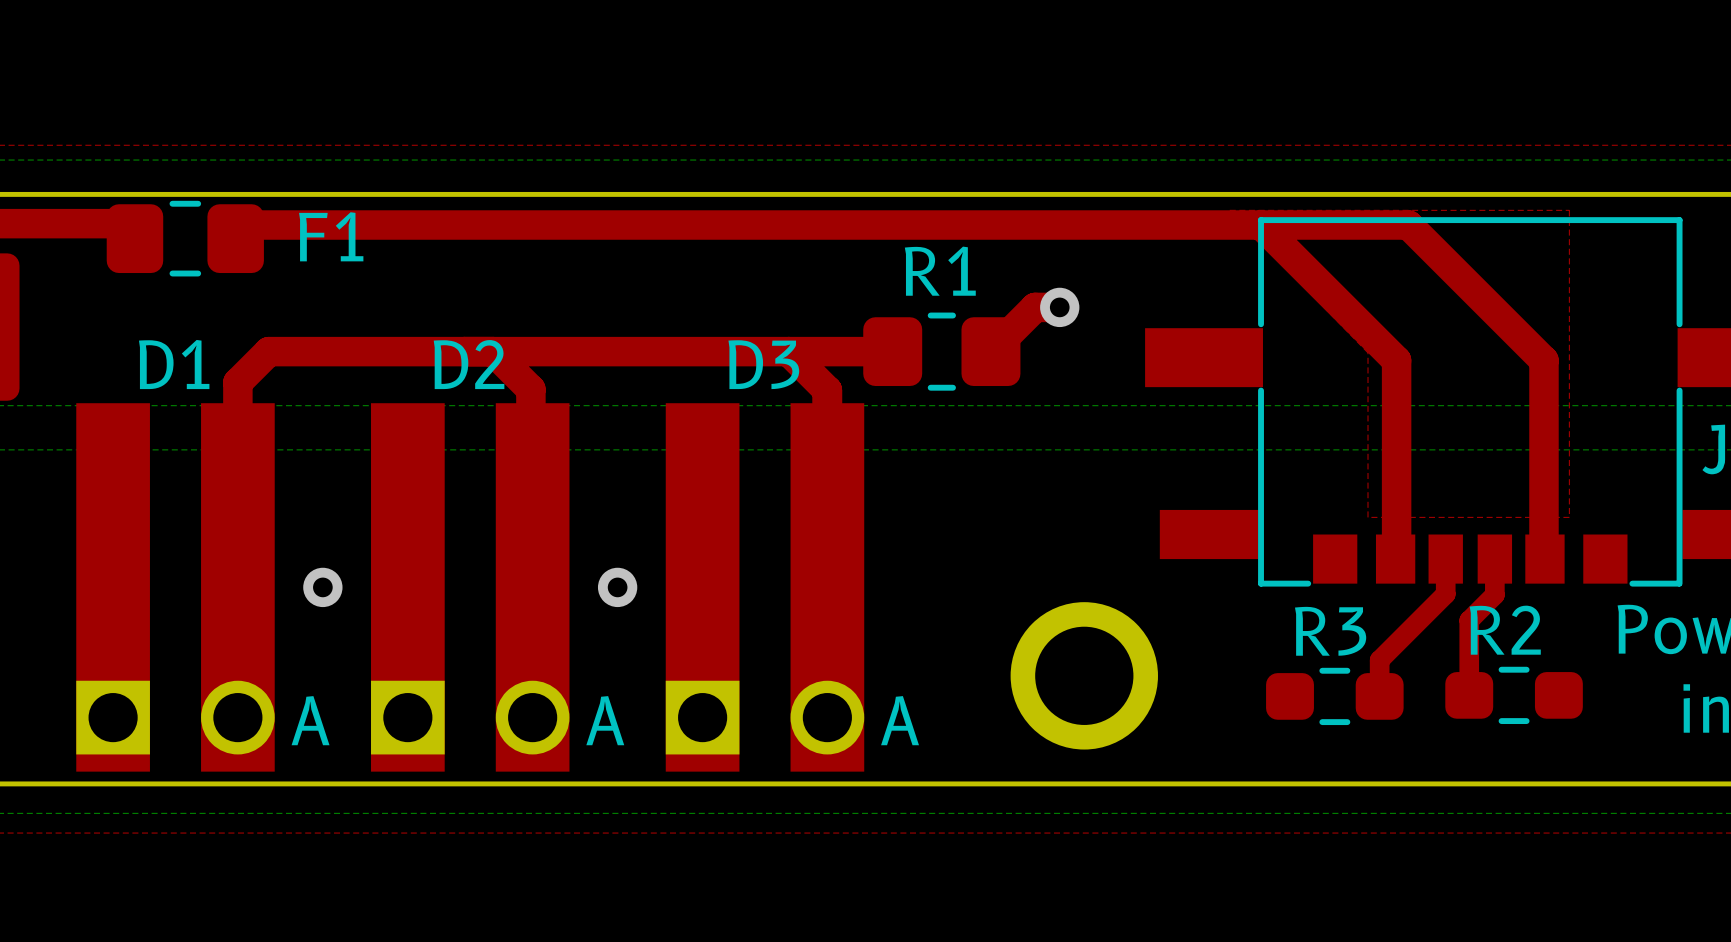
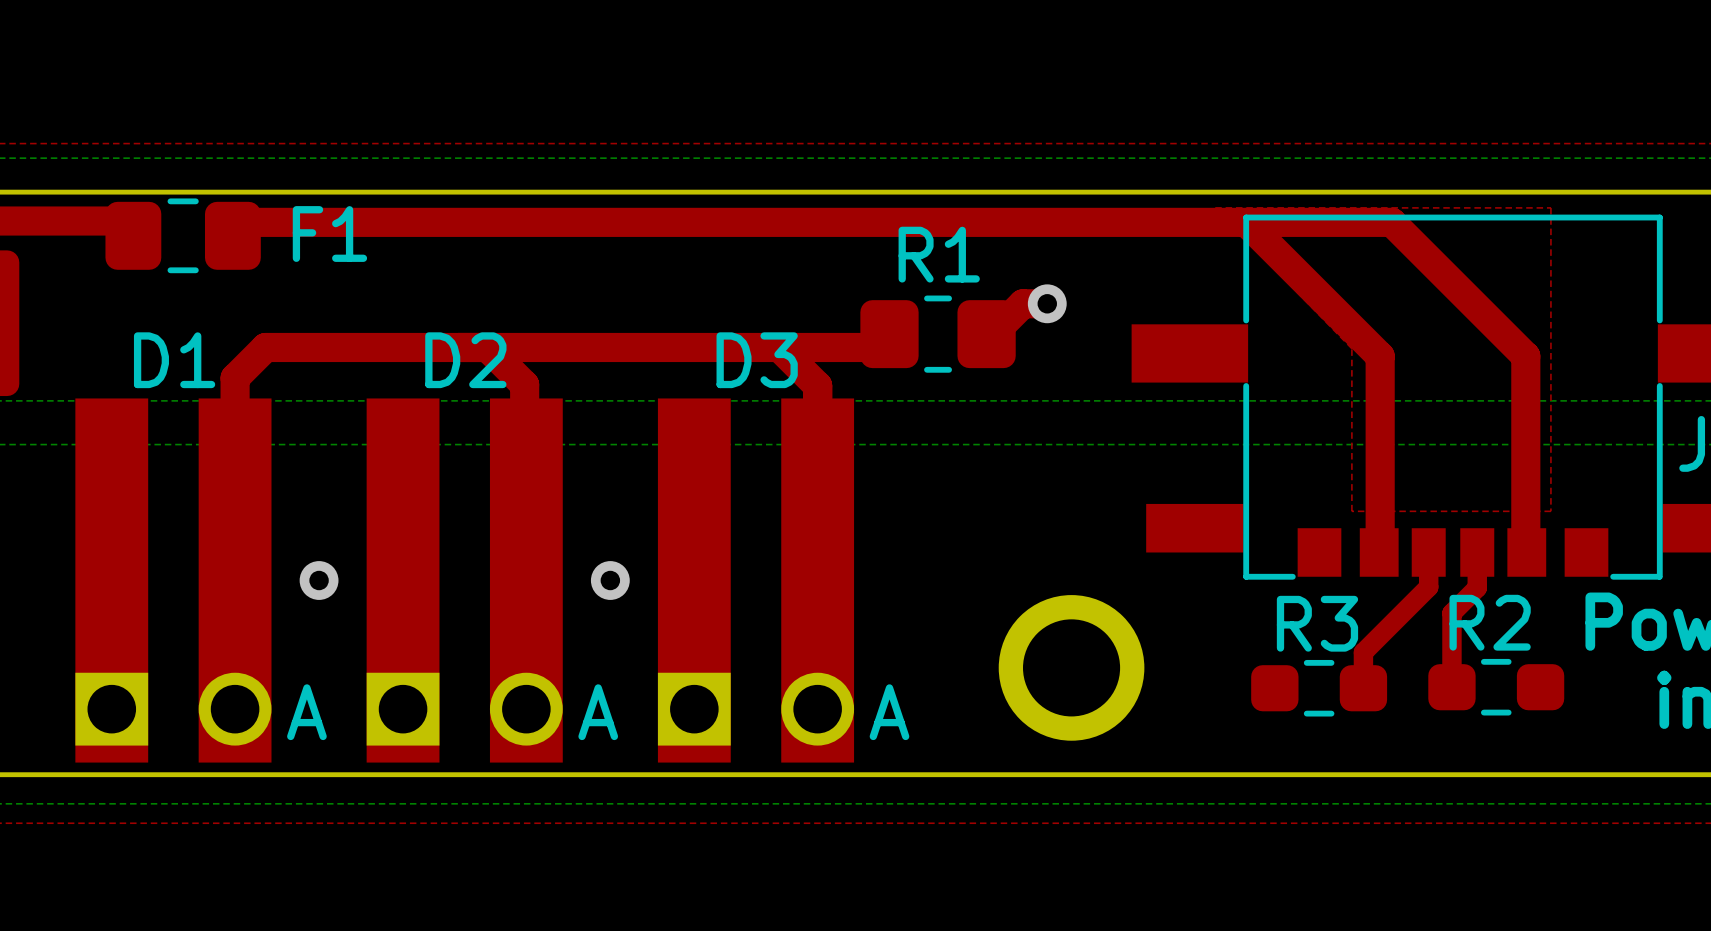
R1 position: (941, 351) -> (938, 334)

